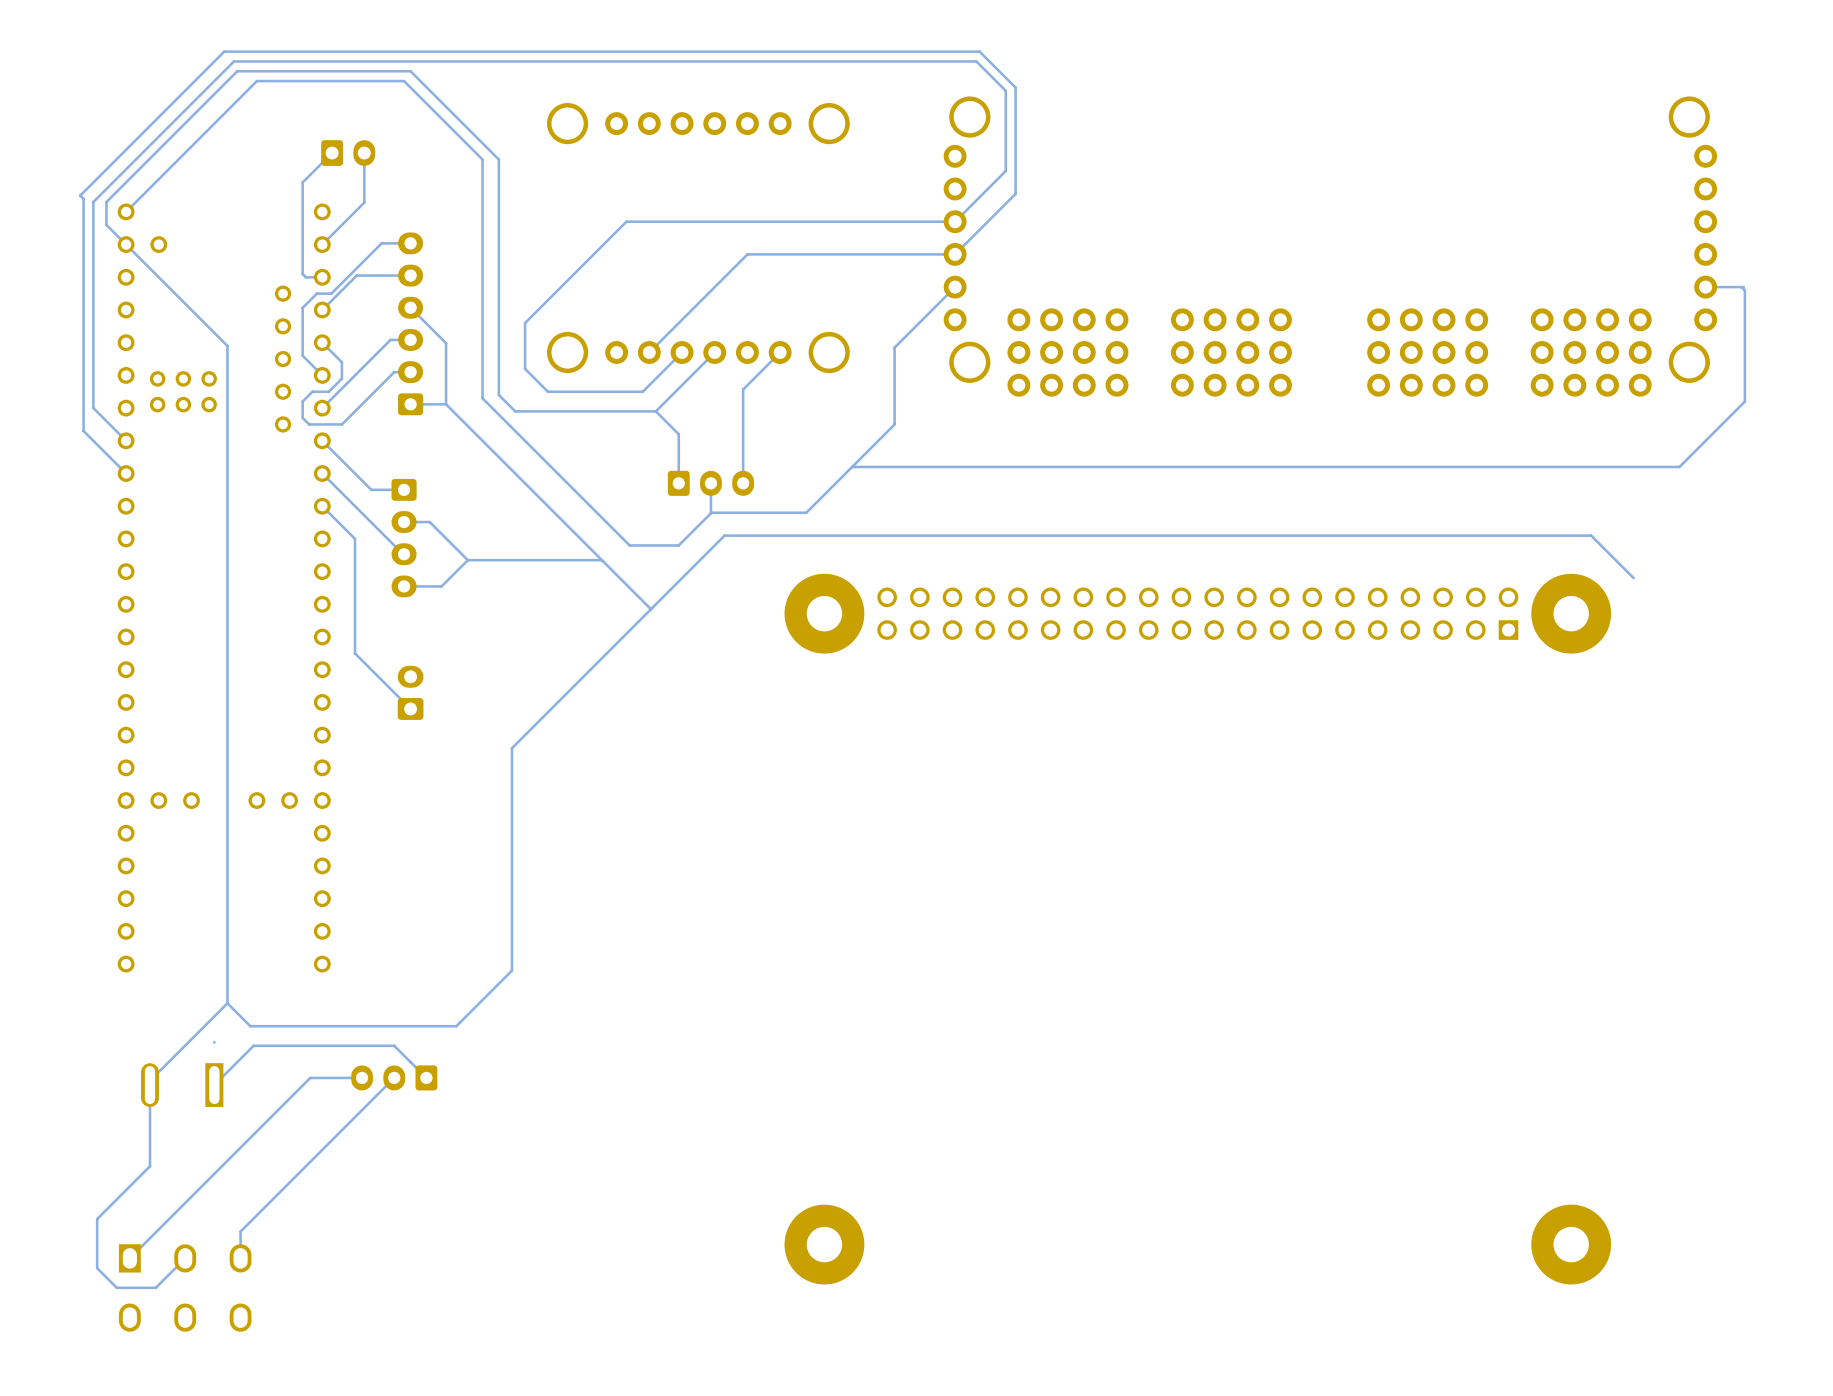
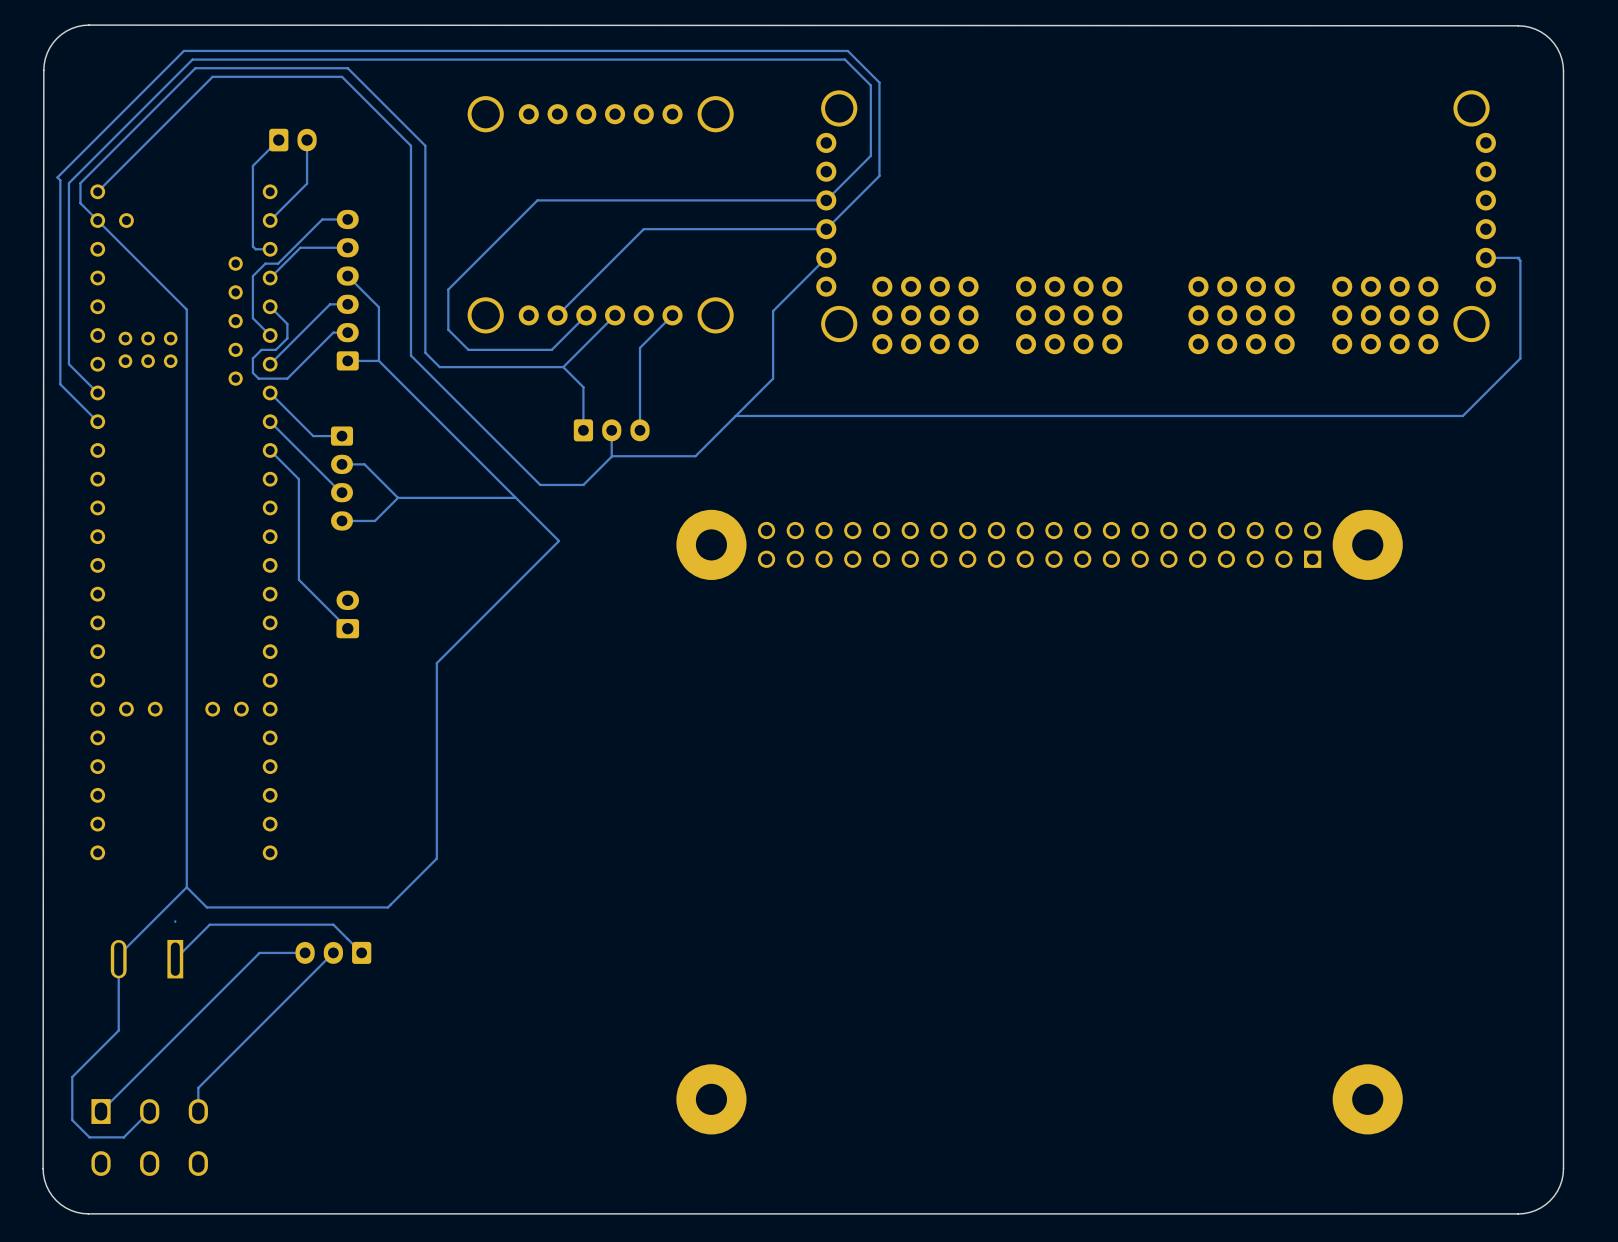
track: (1633, 578) (1591, 535) (724, 535) (650, 609) -> none
board edge: none -> (43, 1168) (43, 1174) (44, 1180) (46, 1185) (56, 1200) (71, 1210) (88, 1213) (1518, 1213) (1529, 1212) (1545, 1204) (1557, 1191) (1561, 1180) (1563, 1168) (1563, 71) (1560, 53) (1554, 43) (1540, 31) (1529, 27) (1518, 25) (89, 25) (71, 28) (61, 34) (49, 47) (45, 58) (43, 70) (43, 1168)

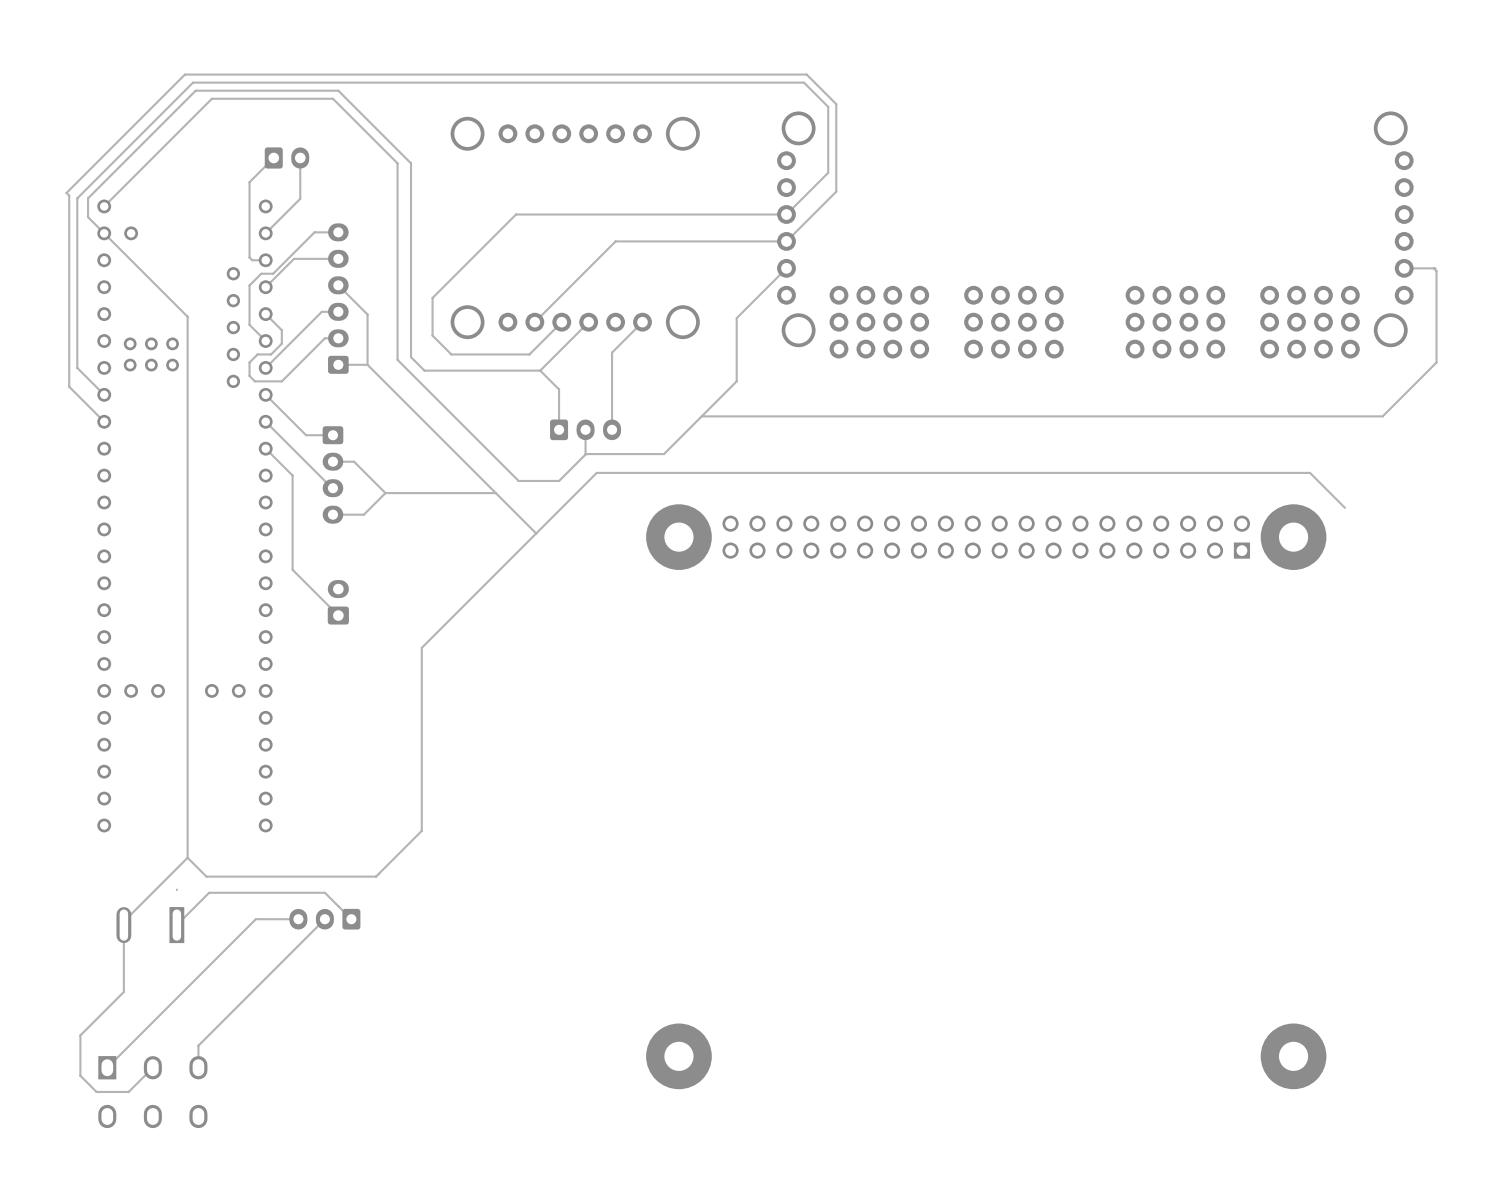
track: none -> (1344, 507) (1310, 472) (596, 472) (536, 533)
board edge: (43, 1168) (43, 1174) (44, 1180) (46, 1185) (56, 1200) (71, 1210) (88, 1213) (1518, 1213) (1529, 1212) (1545, 1204) (1557, 1191) (1561, 1180) (1563, 1168) (1563, 71) (1560, 53) (1554, 43) (1540, 31) (1529, 27) (1518, 25) (89, 25) (71, 28) (61, 34) (49, 47) (45, 58) (43, 70) (43, 1168) -> none

